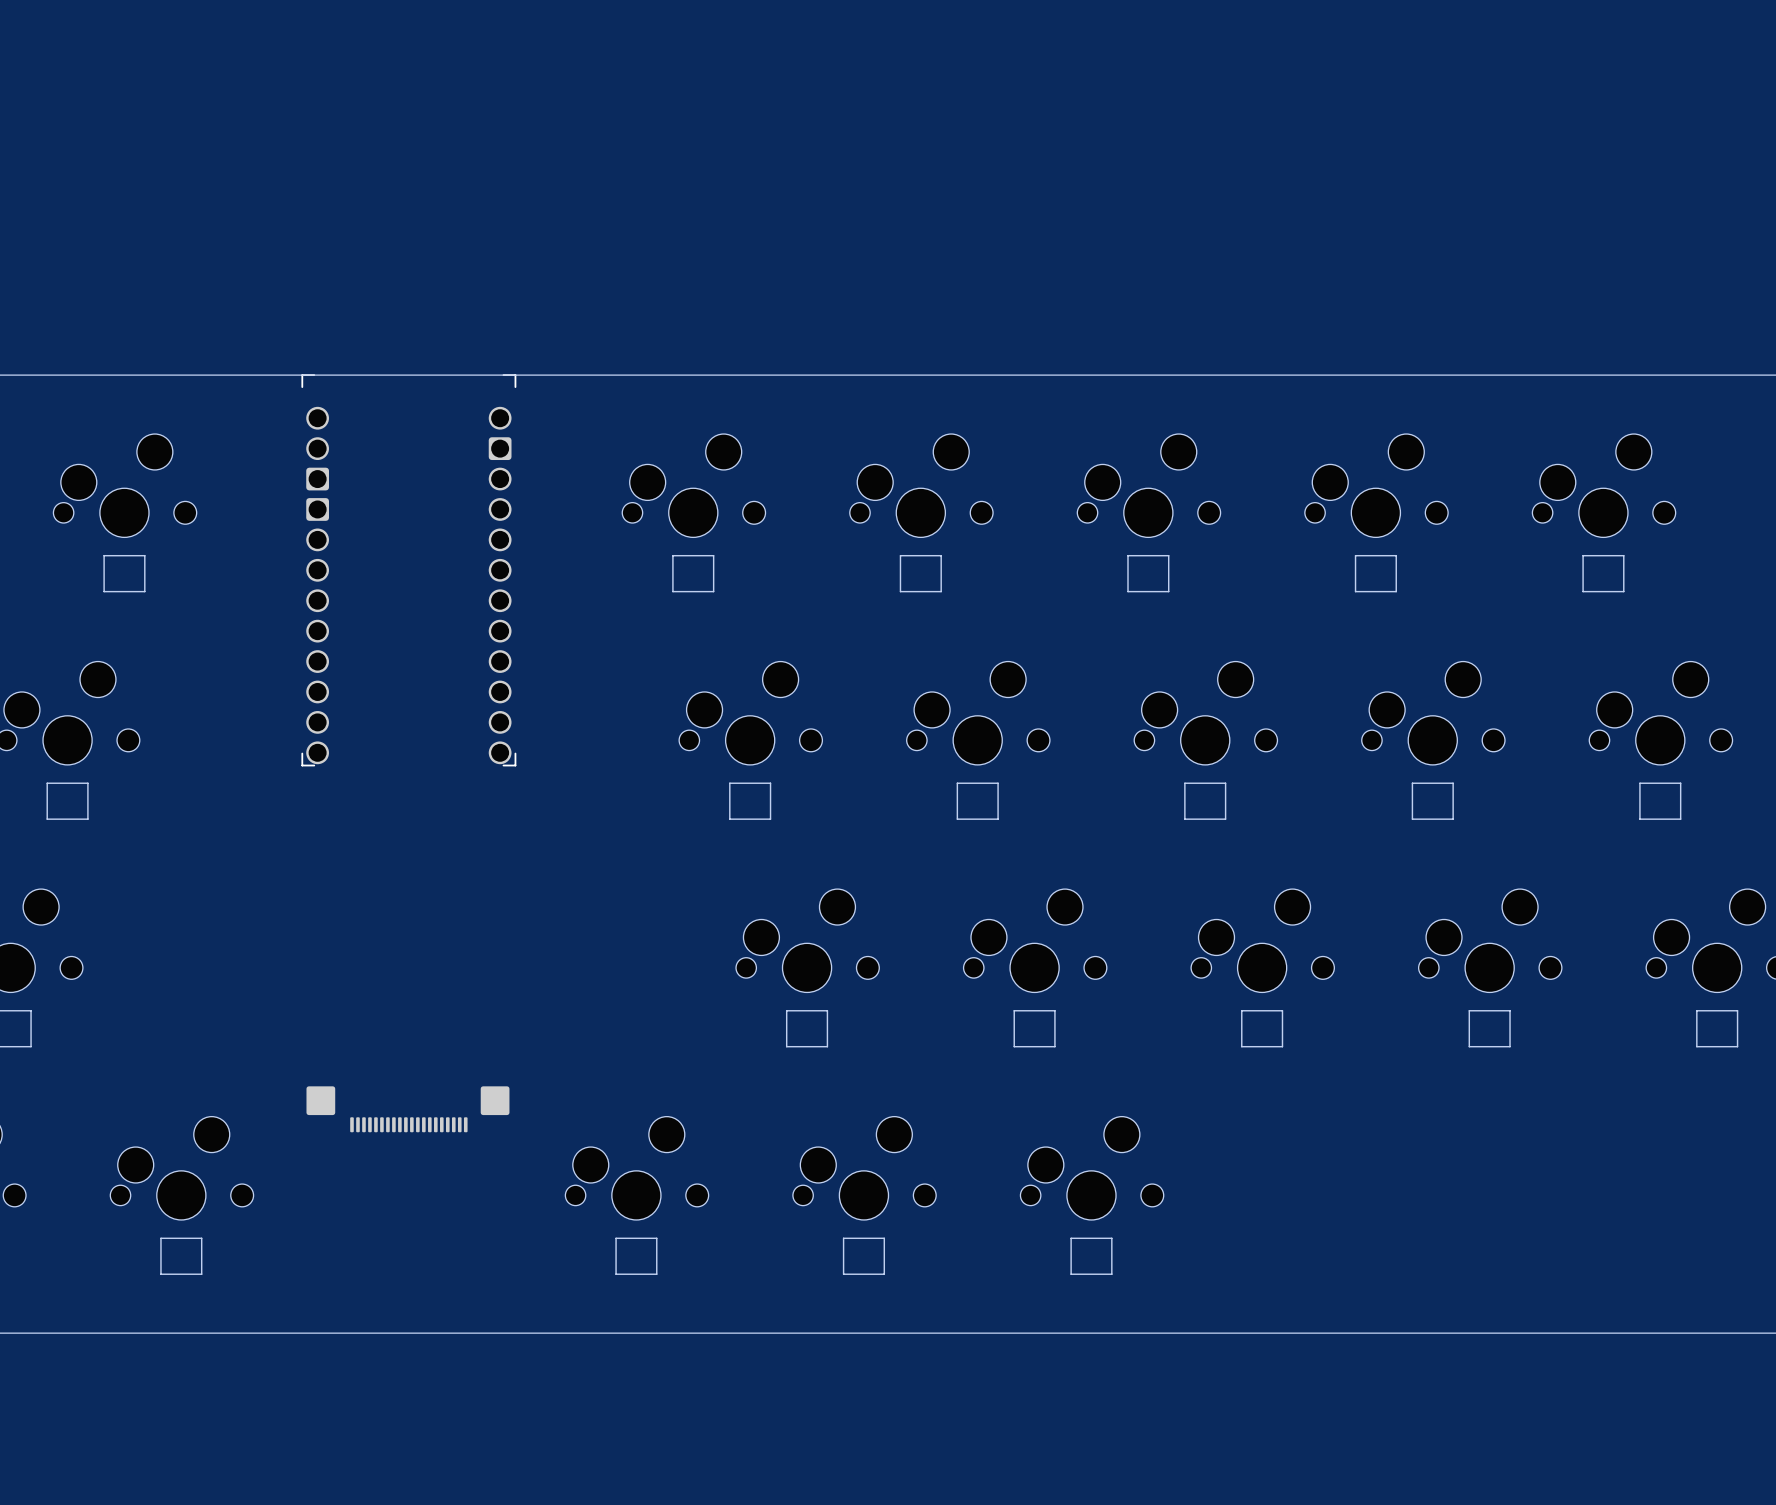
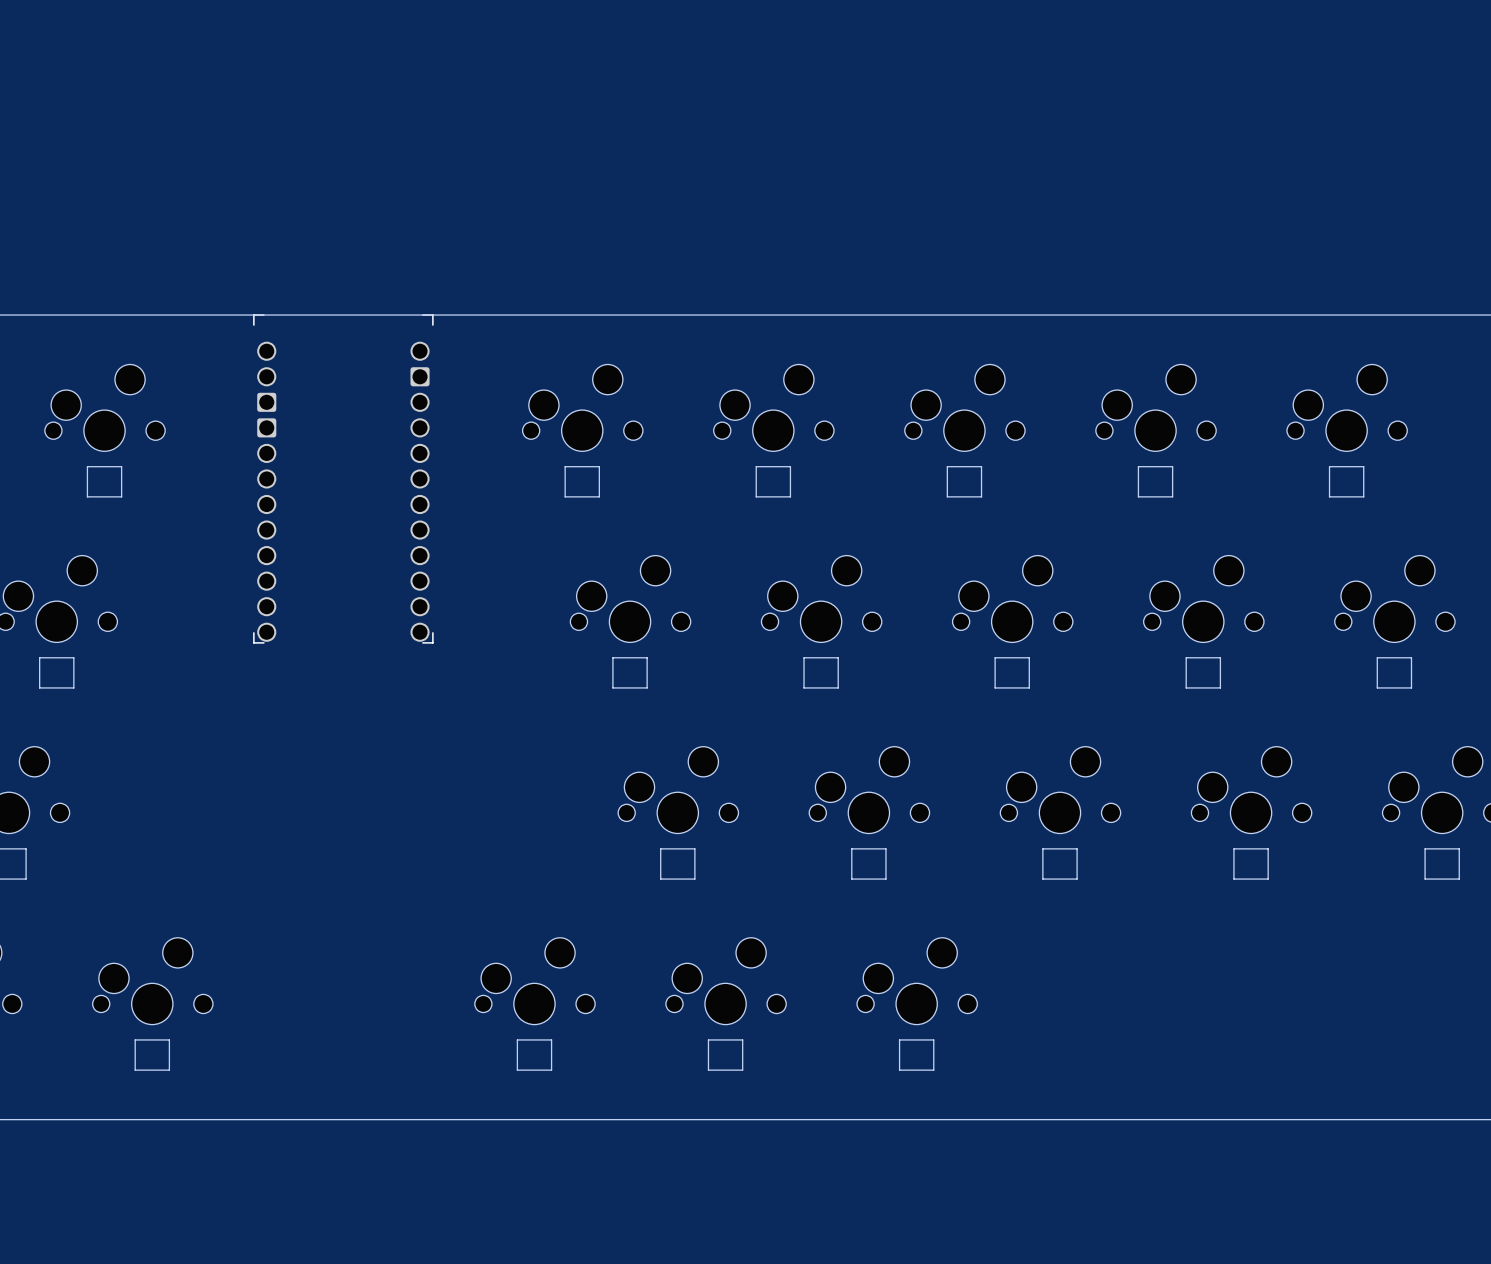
part: (407, 1109) -> none

